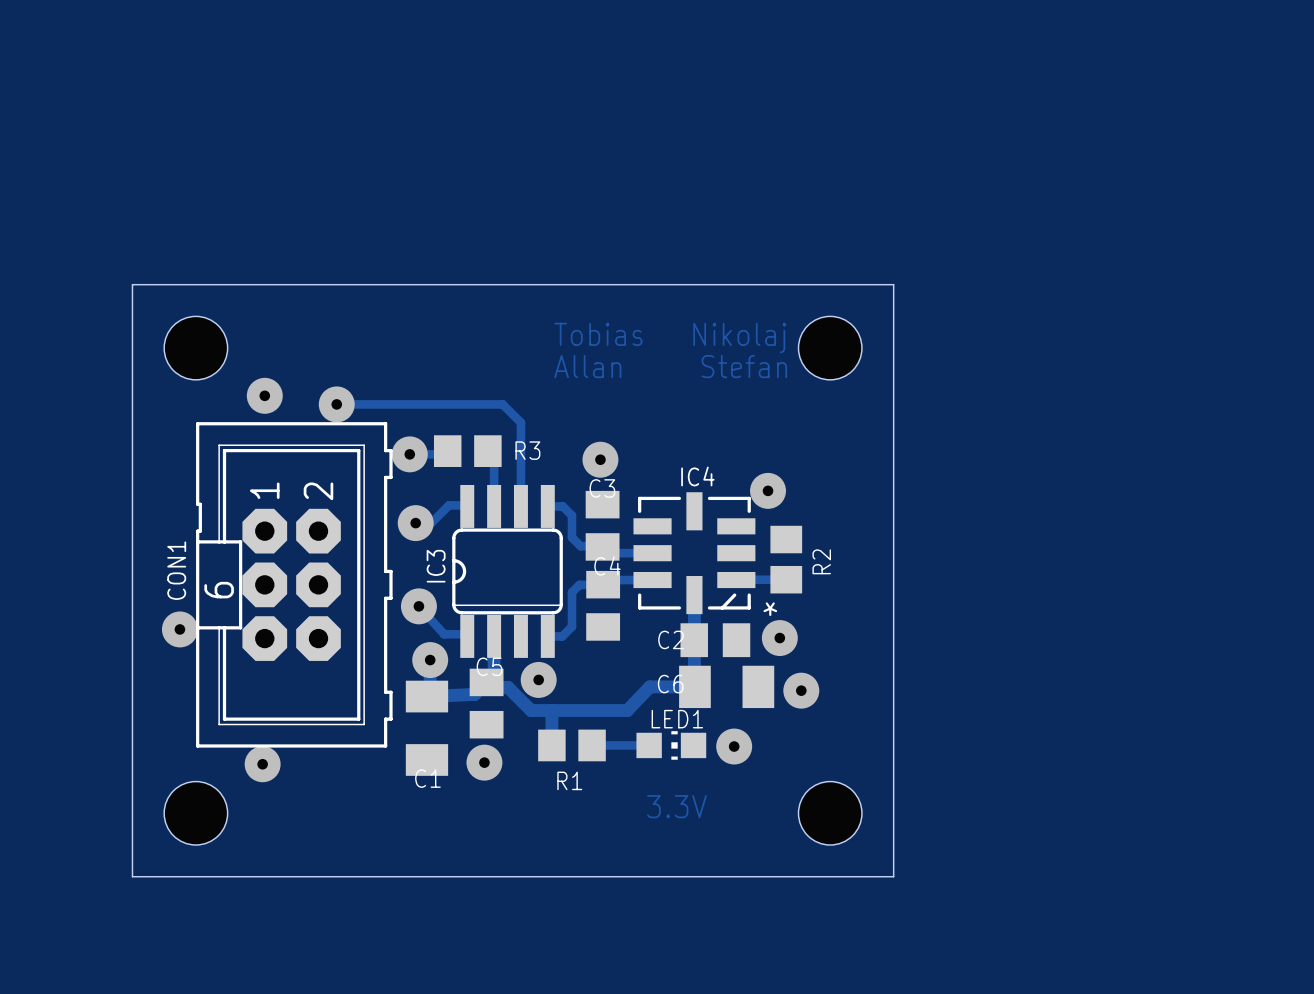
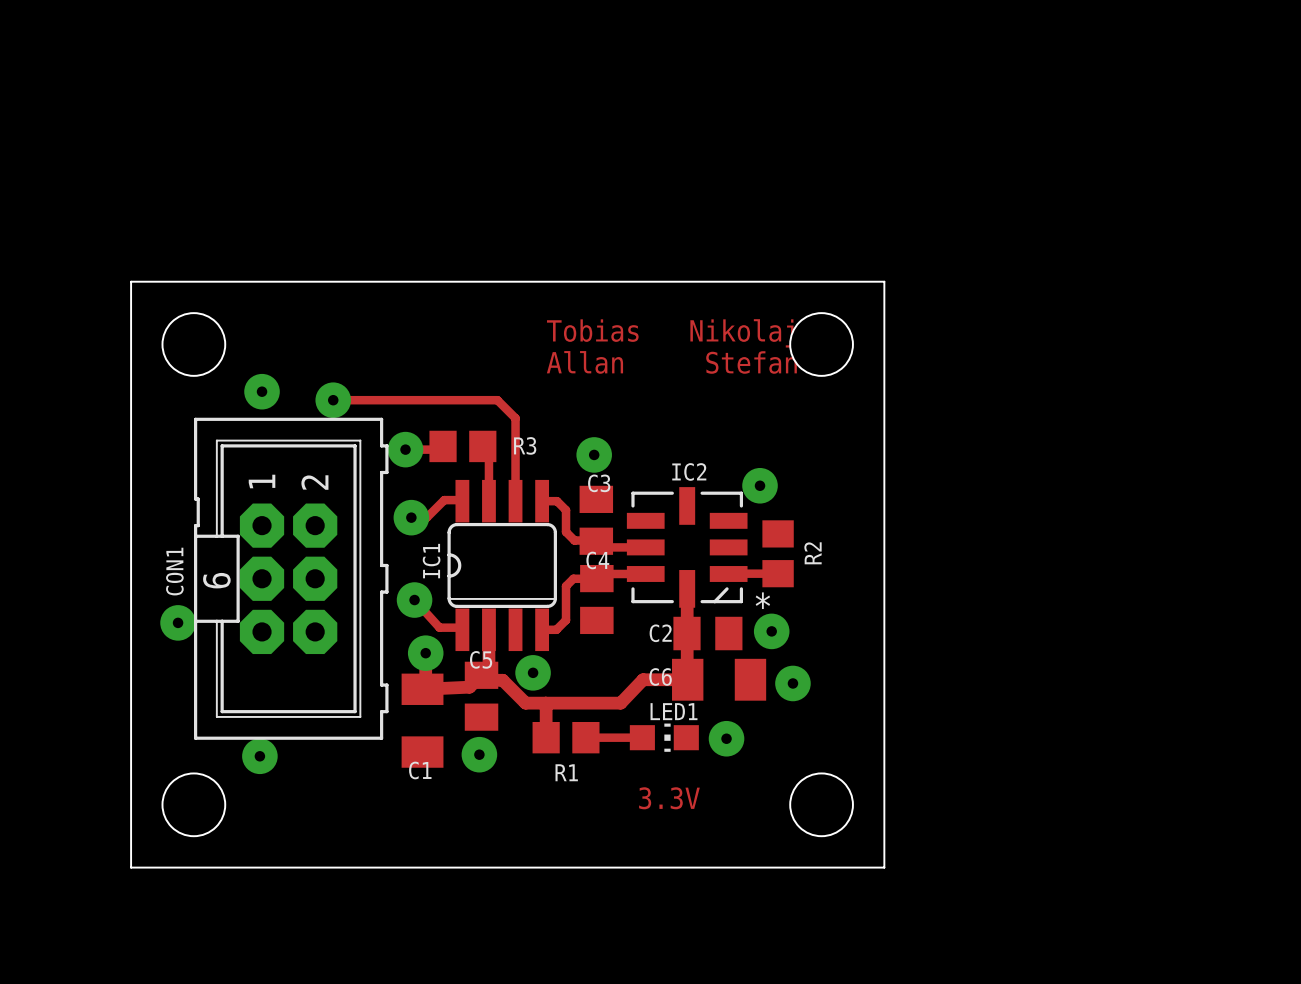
IC4 name: IC4 (697, 476) -> IC2 (689, 471)
IC3 name: IC3 (436, 566) -> IC1 (431, 561)

